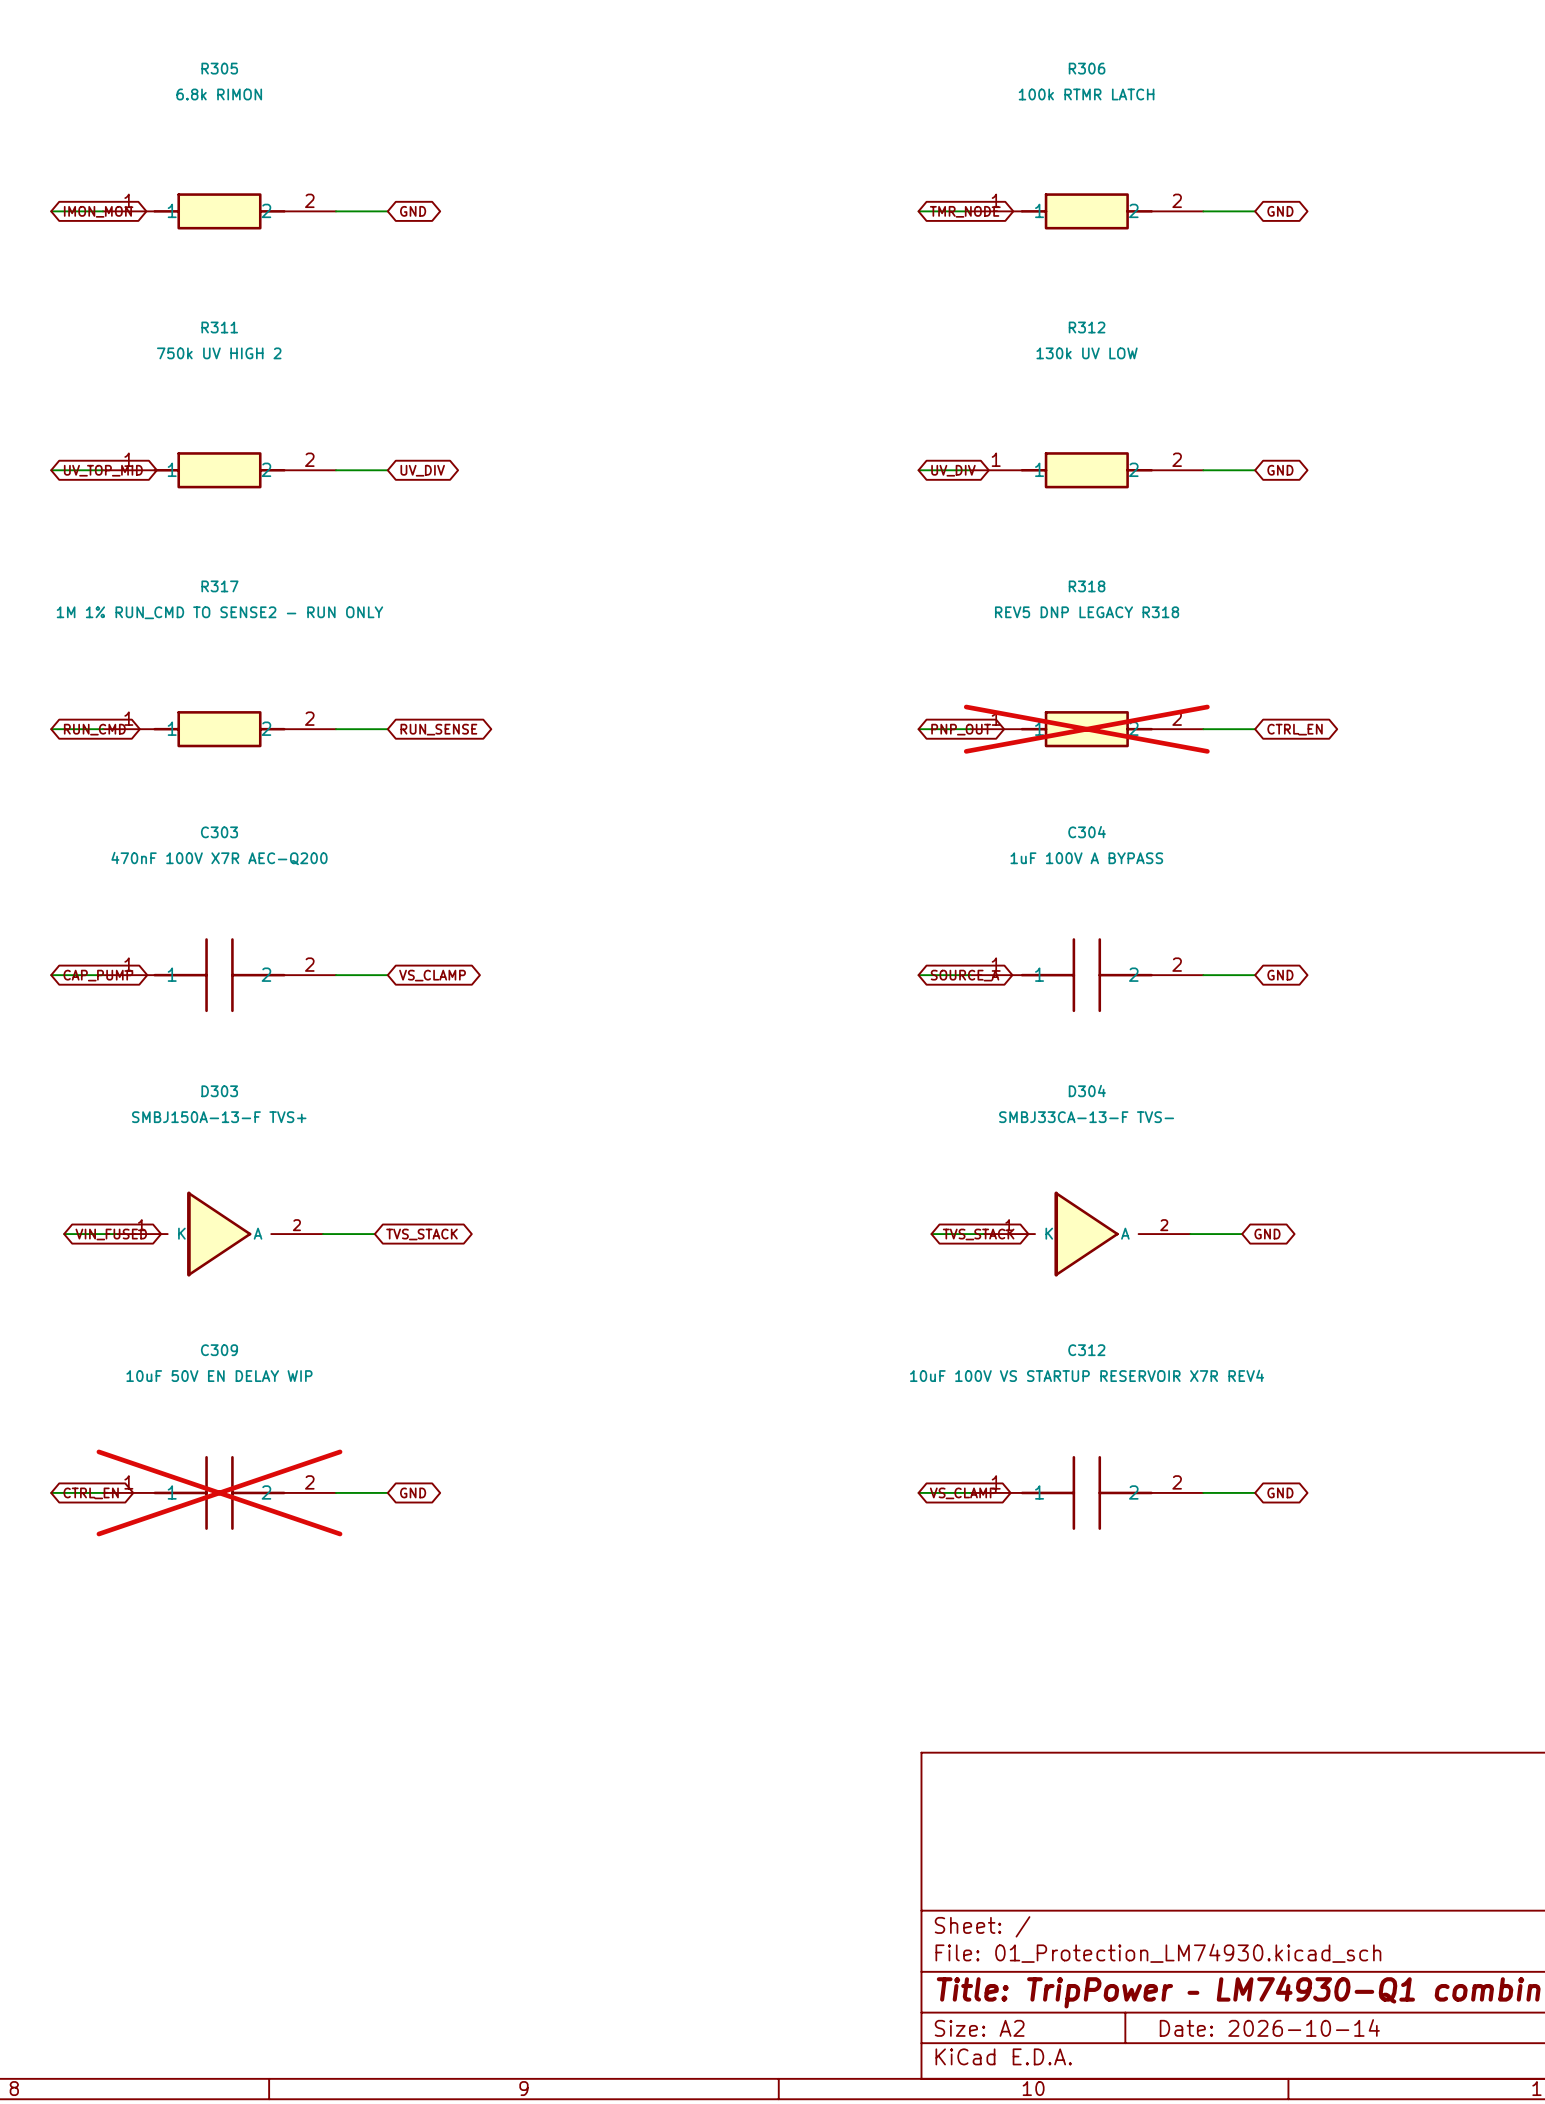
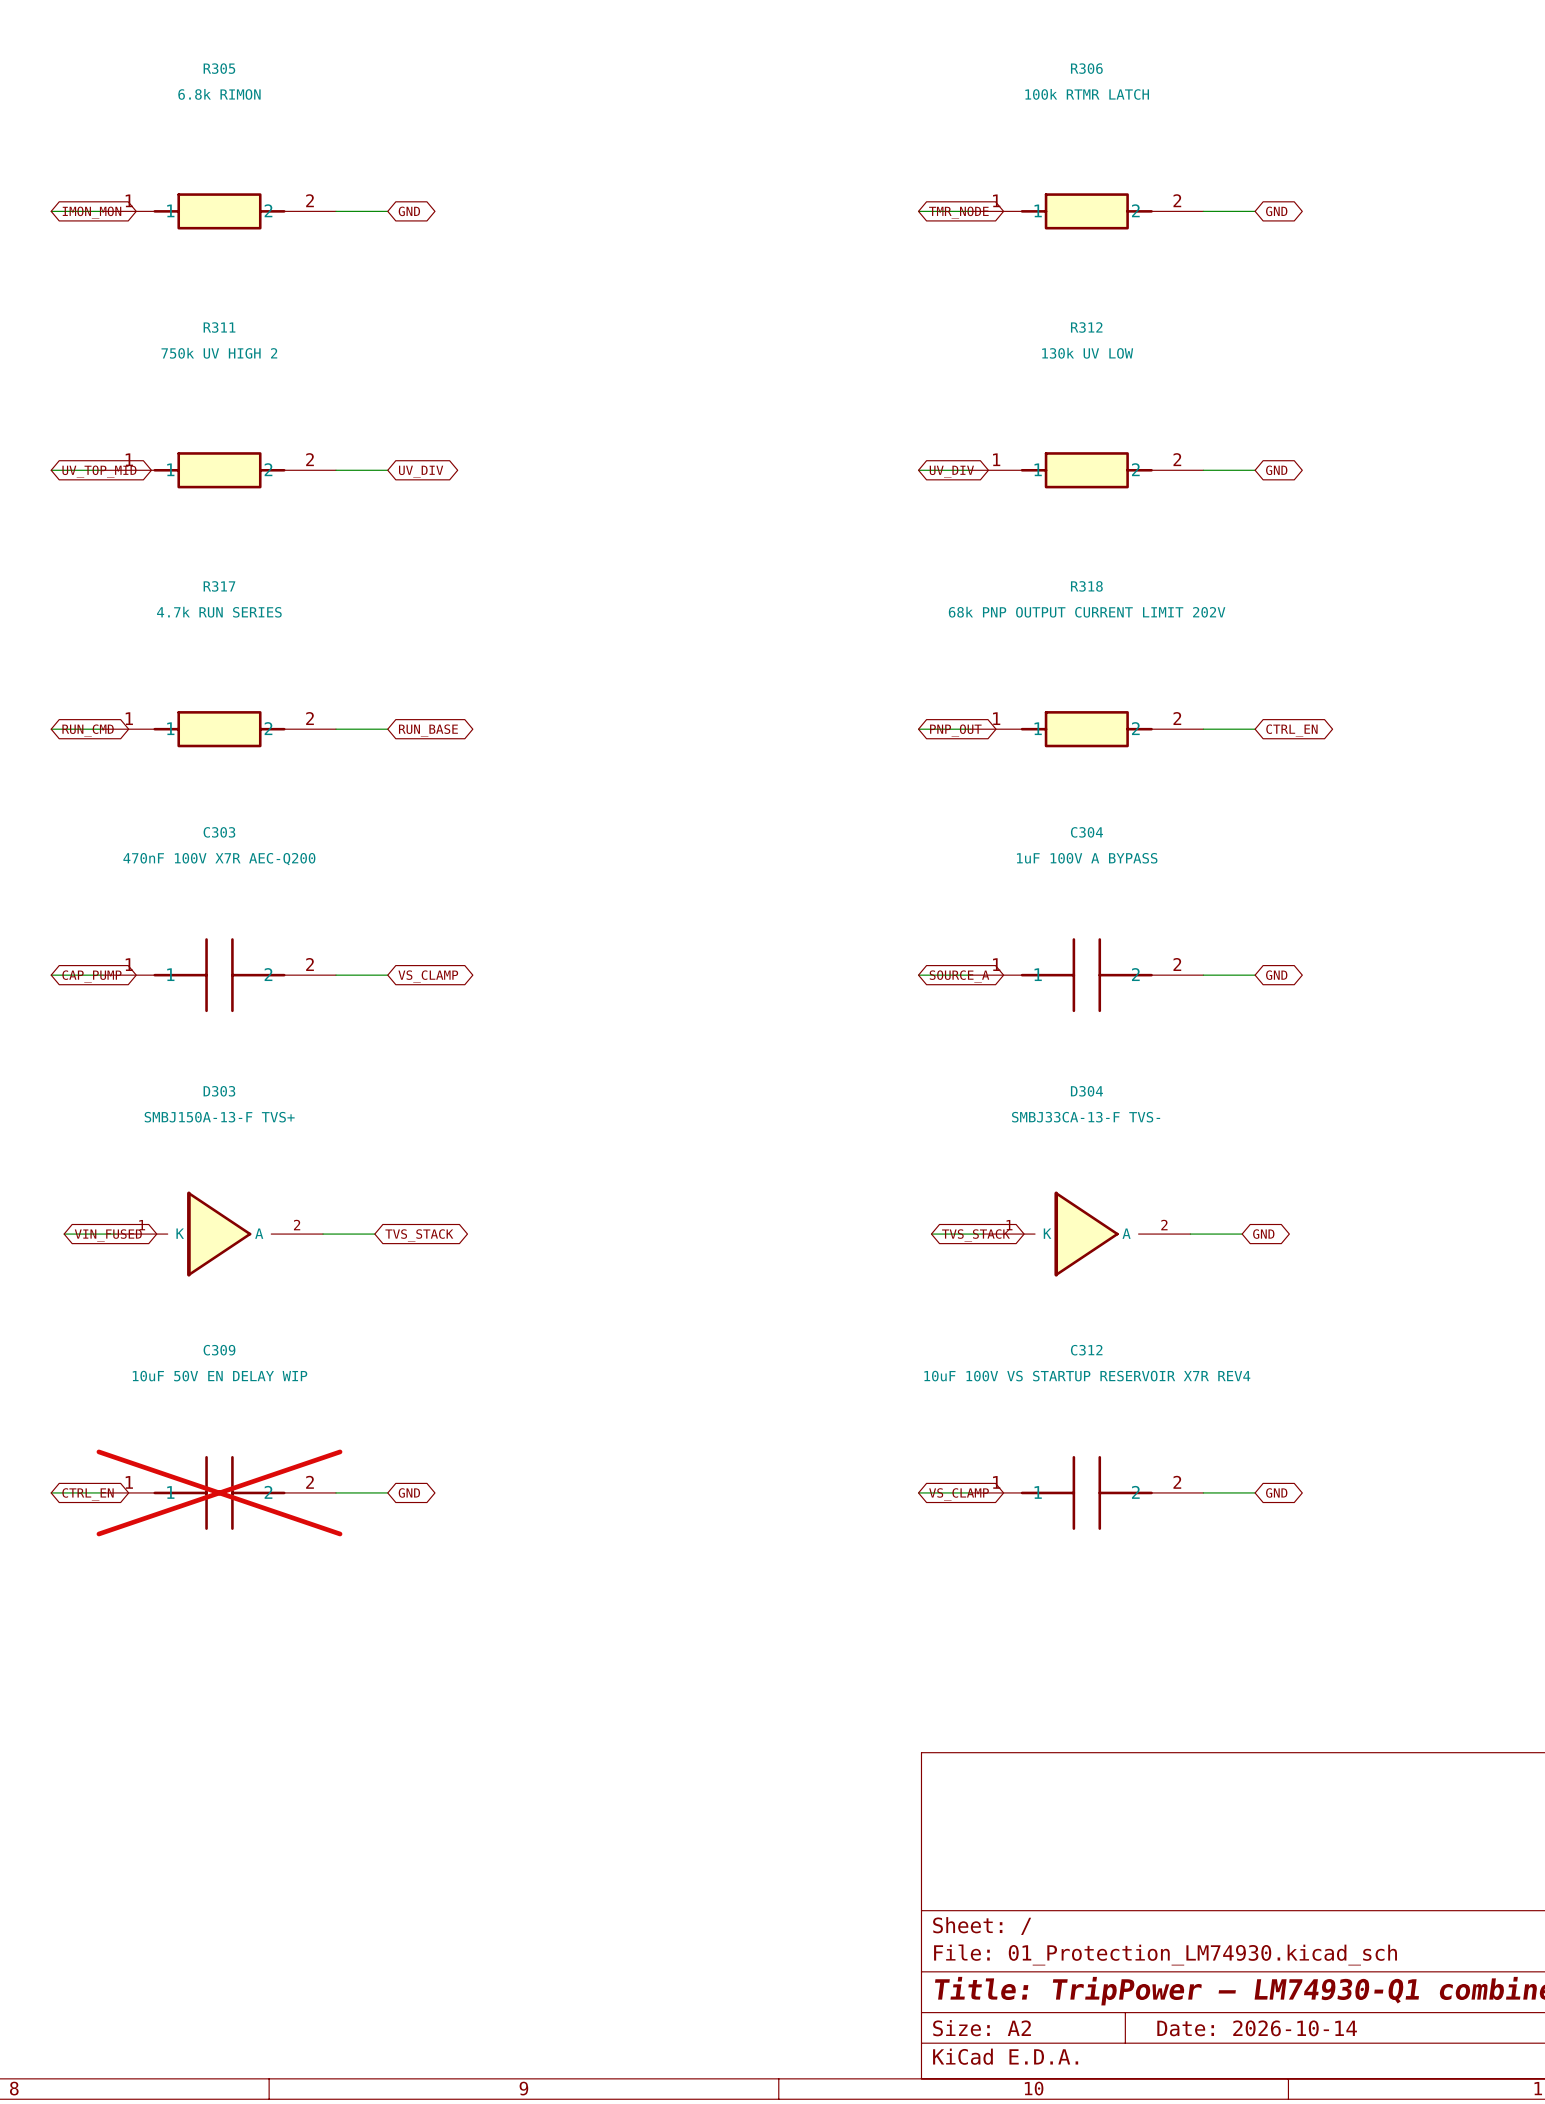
R317 value: 1M 1% RUN_CMD TO SENSE2 - RUN ONLY (219, 612) -> 4.7k RUN SERIES (219, 612)
R318 value: REV5 DNP LEGACY R318 (1087, 612) -> 68k PNP OUTPUT CURRENT LIMIT 202V (1087, 612)
global label: RUN_SENSE (438, 729) -> RUN_BASE (428, 730)
R318 do-not-place cross: (1086, 729) -> none

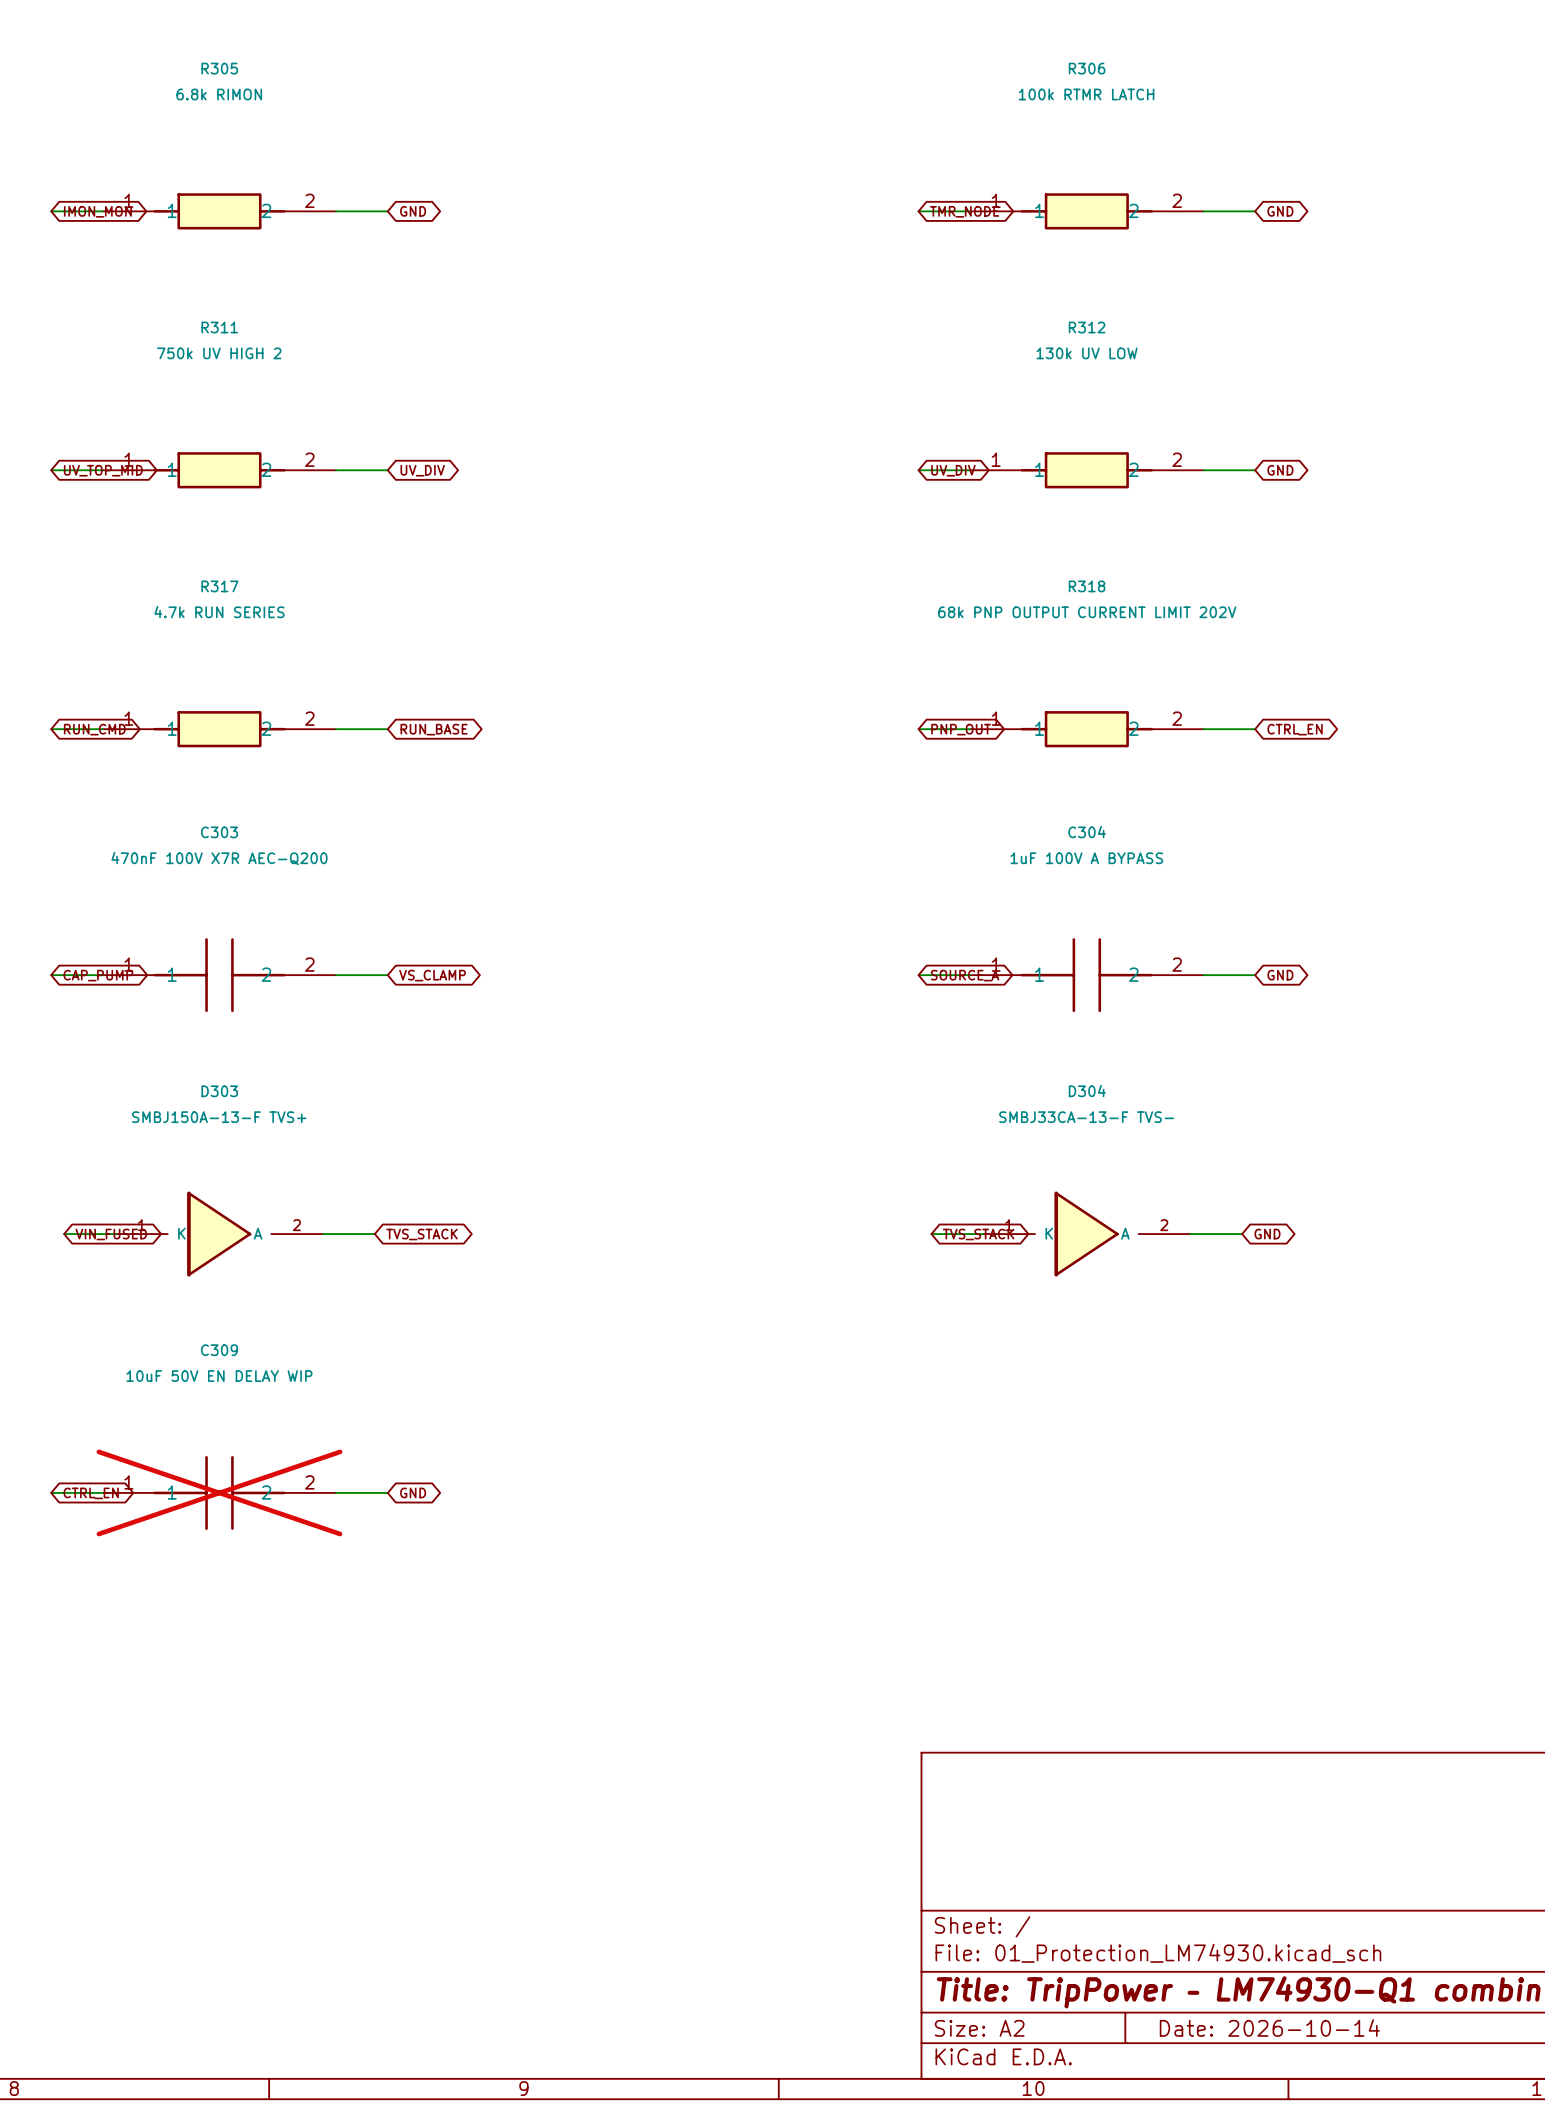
wire: (918, 1492) (970, 1492) -> none
C312: 10uF 100V VS STARTUP RESERVOIR X7R REV4 (1086, 1492) -> none
wire: (1203, 1492) (1255, 1492) -> none
global label: GND (1276, 1492) -> none
global label: VS_CLAMP (959, 1494) -> none

